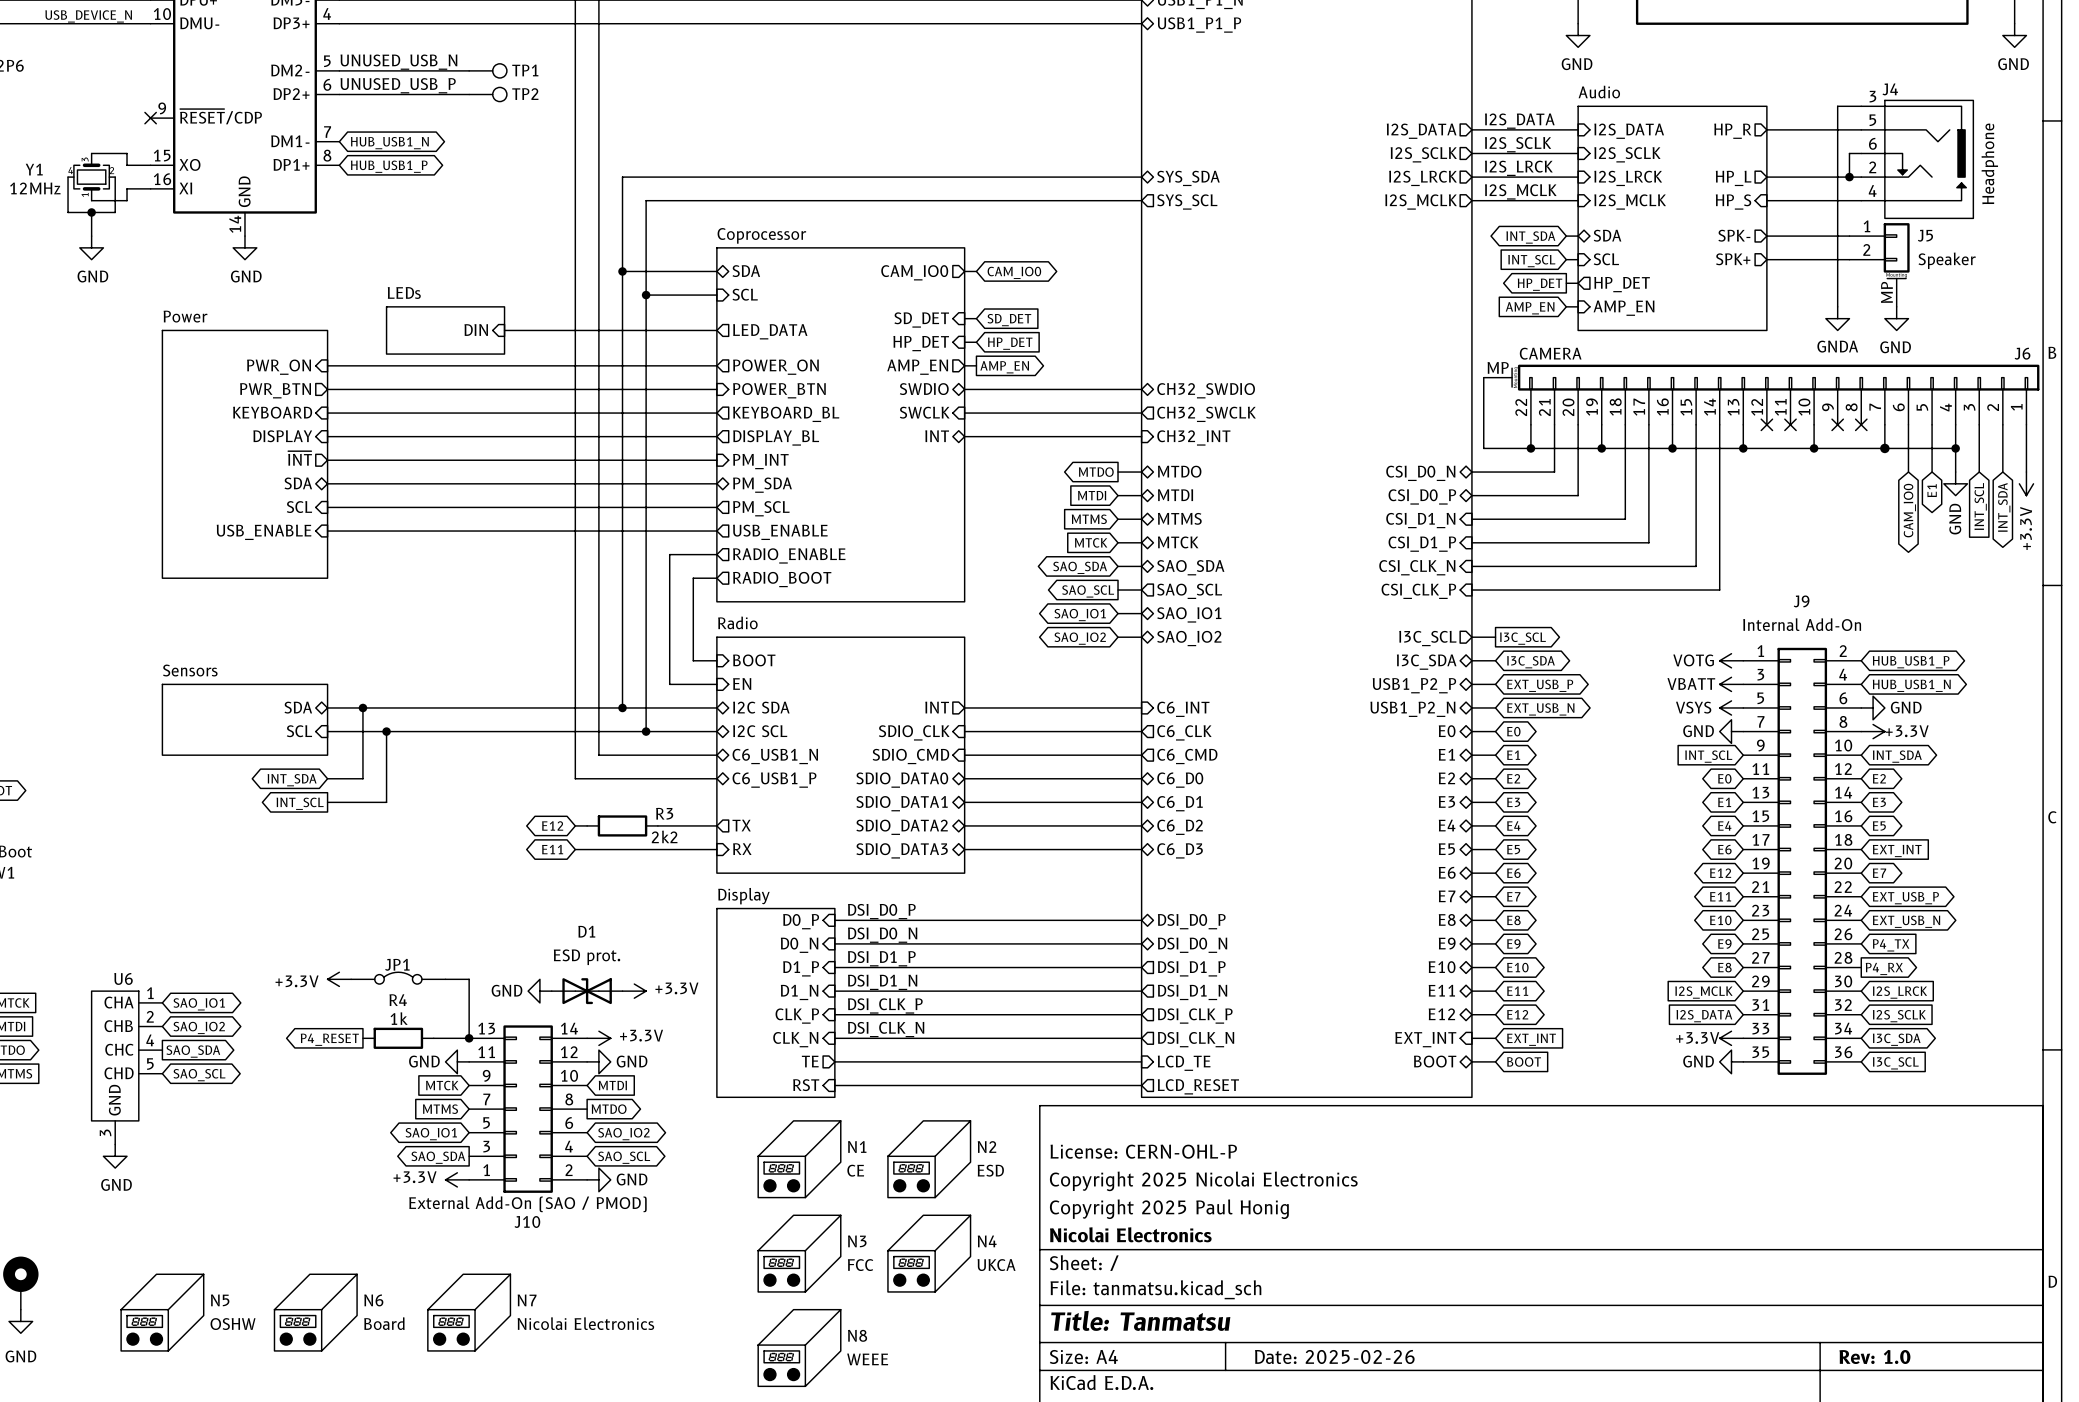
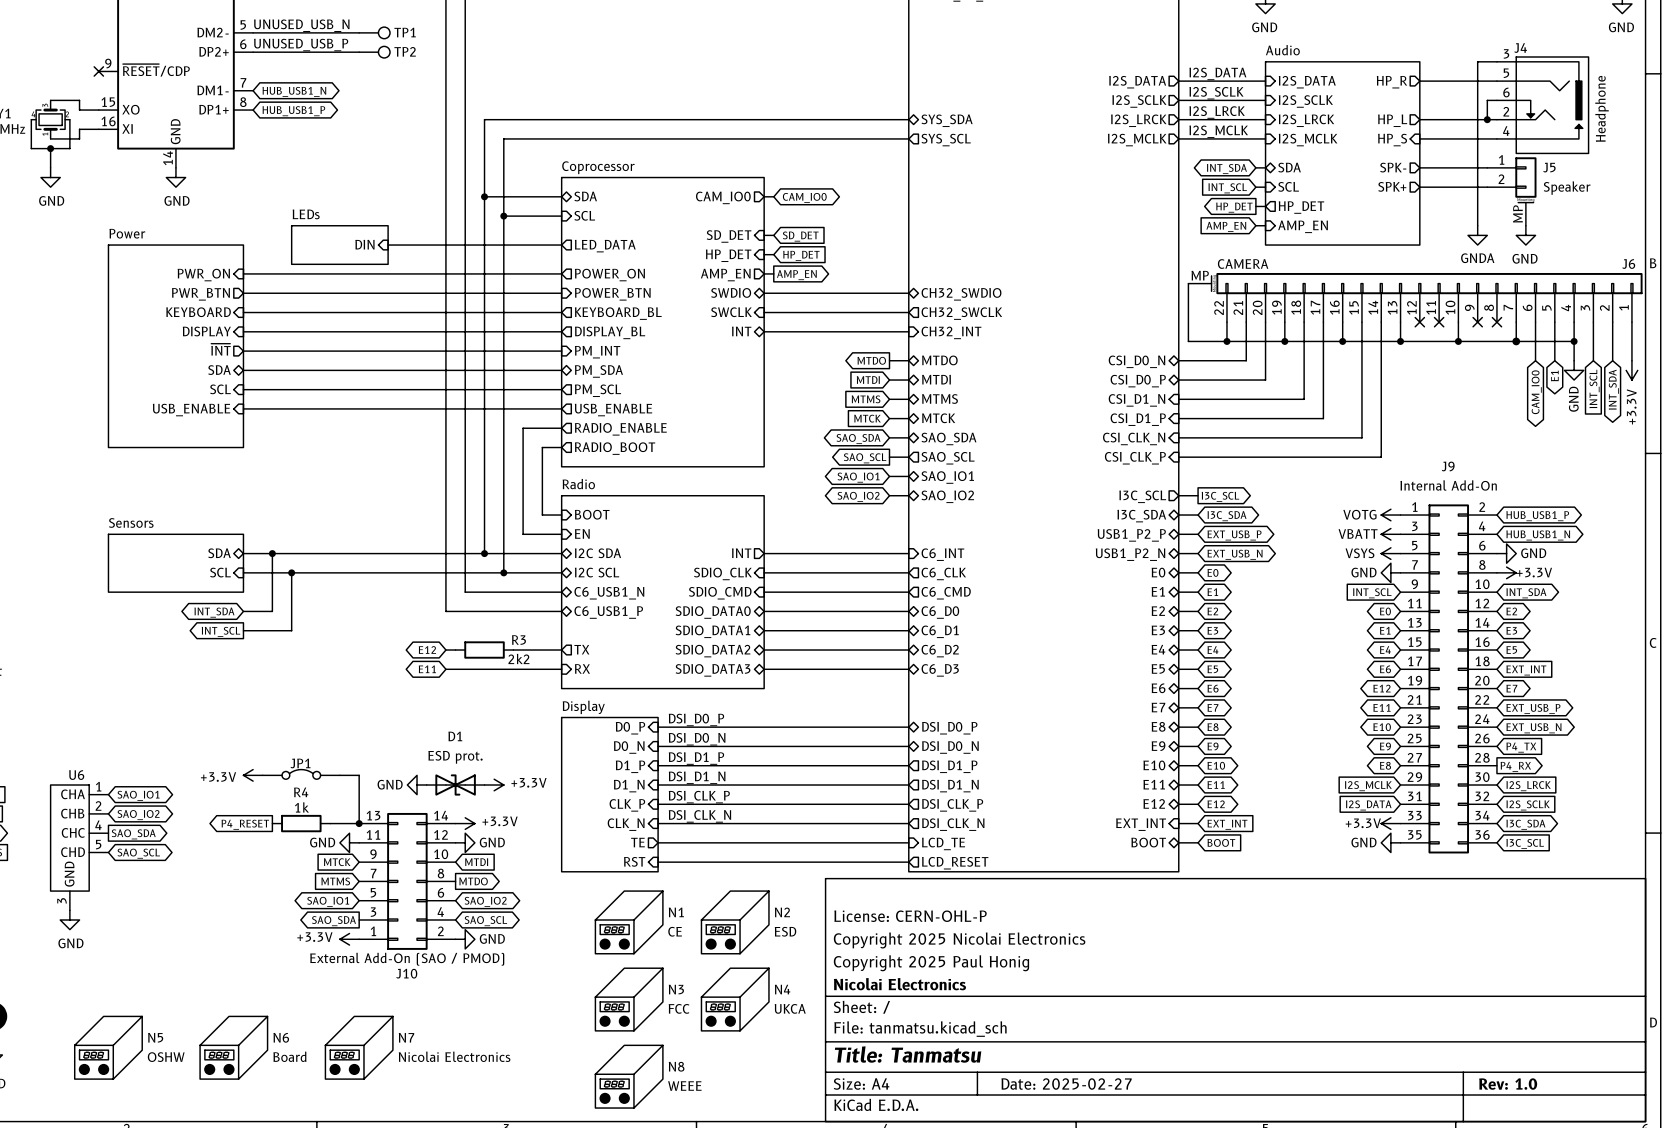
title block: Date: 2025-02-26 (1334, 1356) -> Date: 2025-02-27 (1066, 1084)

